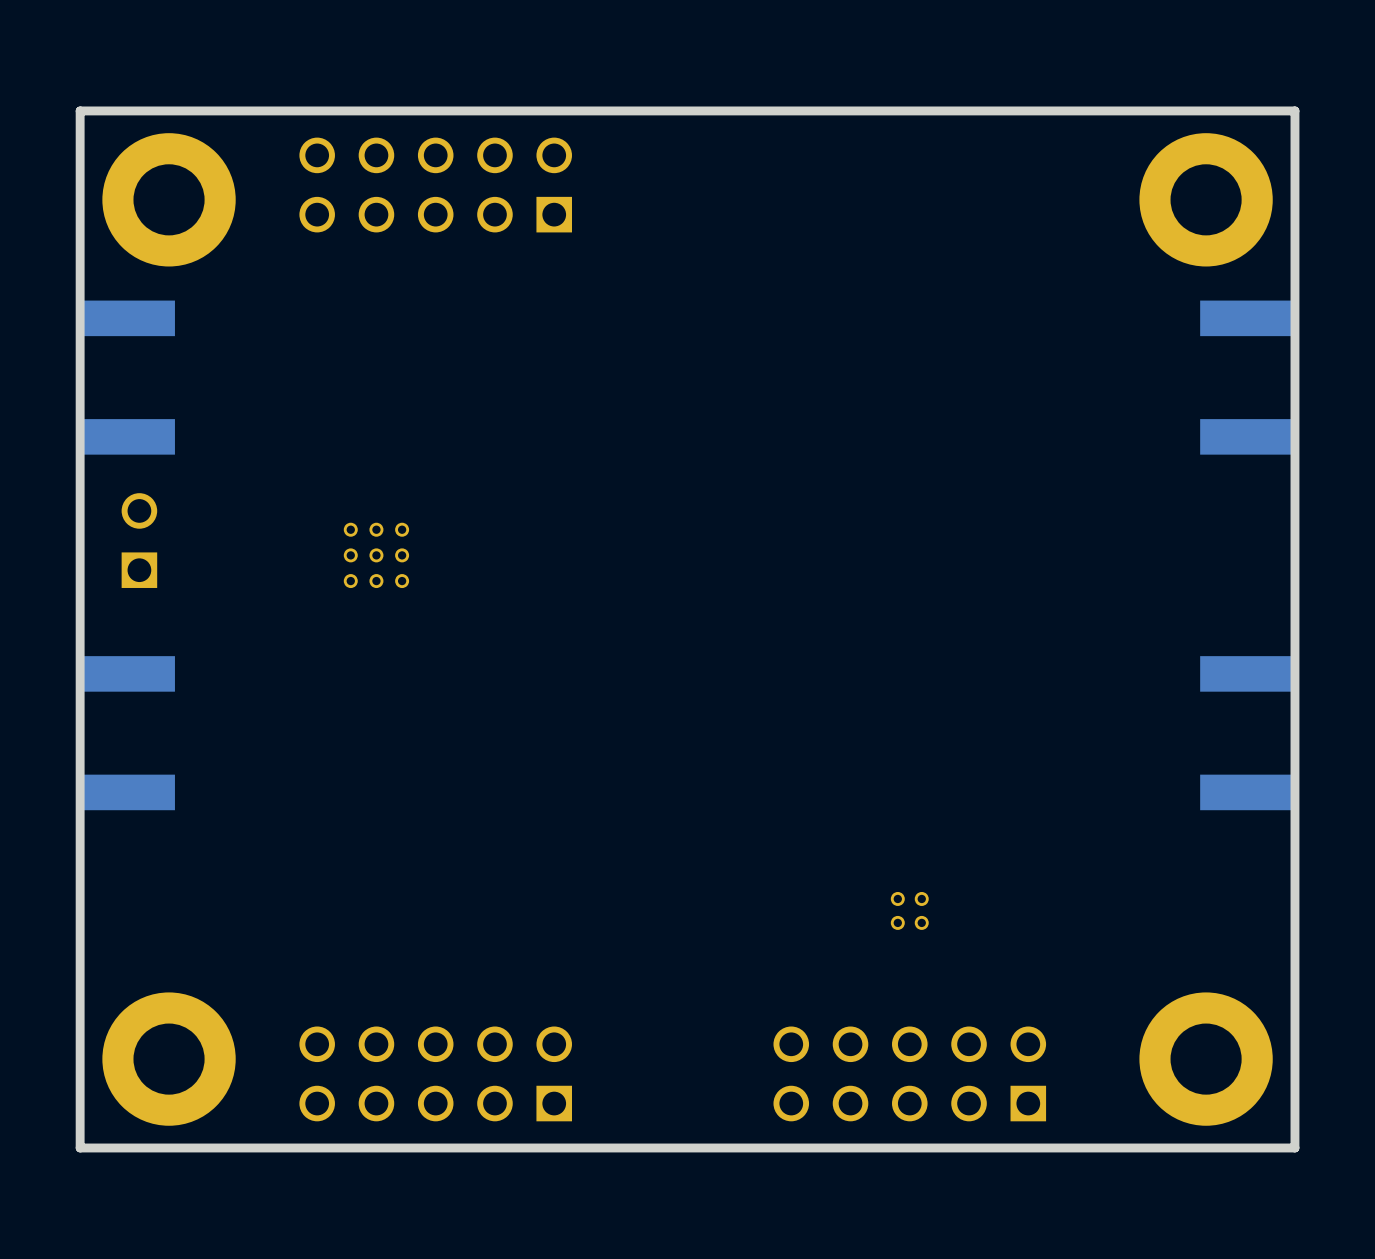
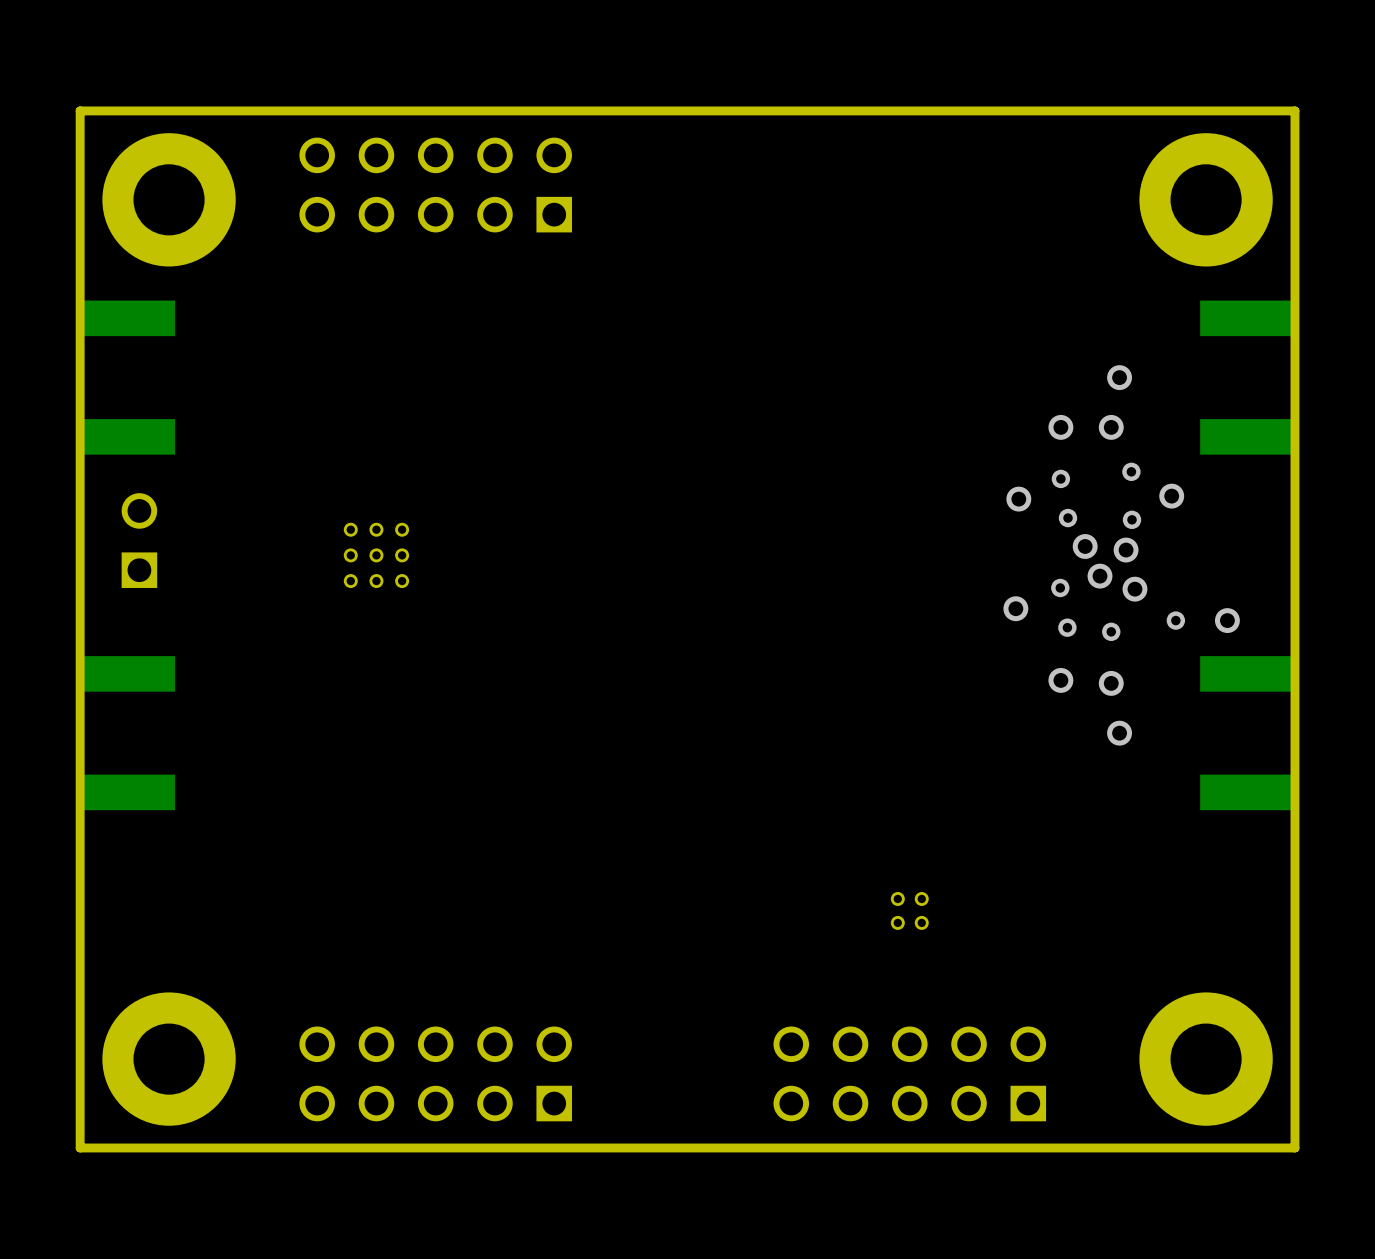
via: none -> (1119, 377)
via: none -> (1060, 427)
via: none -> (1111, 427)
via: none -> (1131, 471)
via: none -> (1060, 478)
via: none -> (1171, 496)
via: none -> (1018, 499)
via: none -> (1068, 518)
via: none -> (1132, 519)
via: none -> (1085, 546)
via: none -> (1126, 550)
via: none -> (1100, 576)
via: none -> (1060, 587)
via: none -> (1134, 589)
via: none -> (1015, 608)
via: none -> (1175, 620)
via: none -> (1227, 620)
via: none -> (1067, 627)
via: none -> (1111, 631)
via: none -> (1060, 680)
via: none -> (1111, 683)
via: none -> (1119, 733)

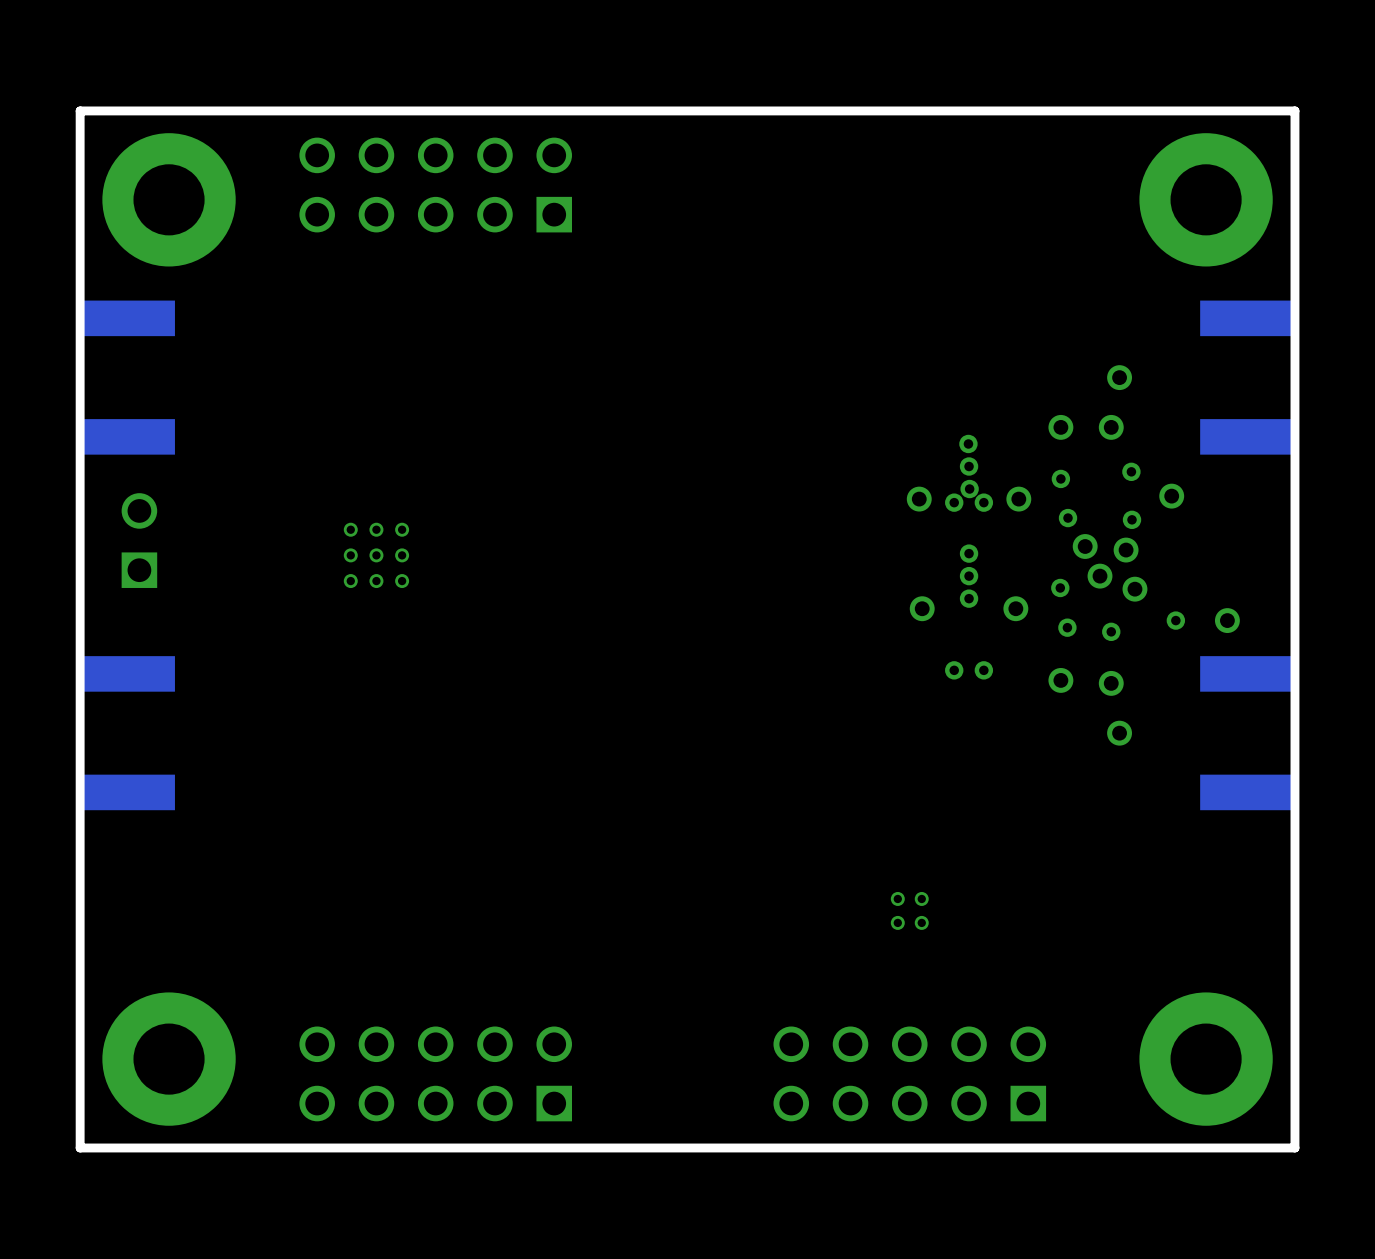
via: none -> (968, 443)
via: none -> (969, 466)
via: none -> (969, 489)
via: none -> (919, 499)
via: none -> (954, 502)
via: none -> (983, 502)
via: none -> (969, 553)
via: none -> (969, 576)
via: none -> (969, 598)
via: none -> (922, 608)
via: none -> (954, 670)
via: none -> (983, 670)

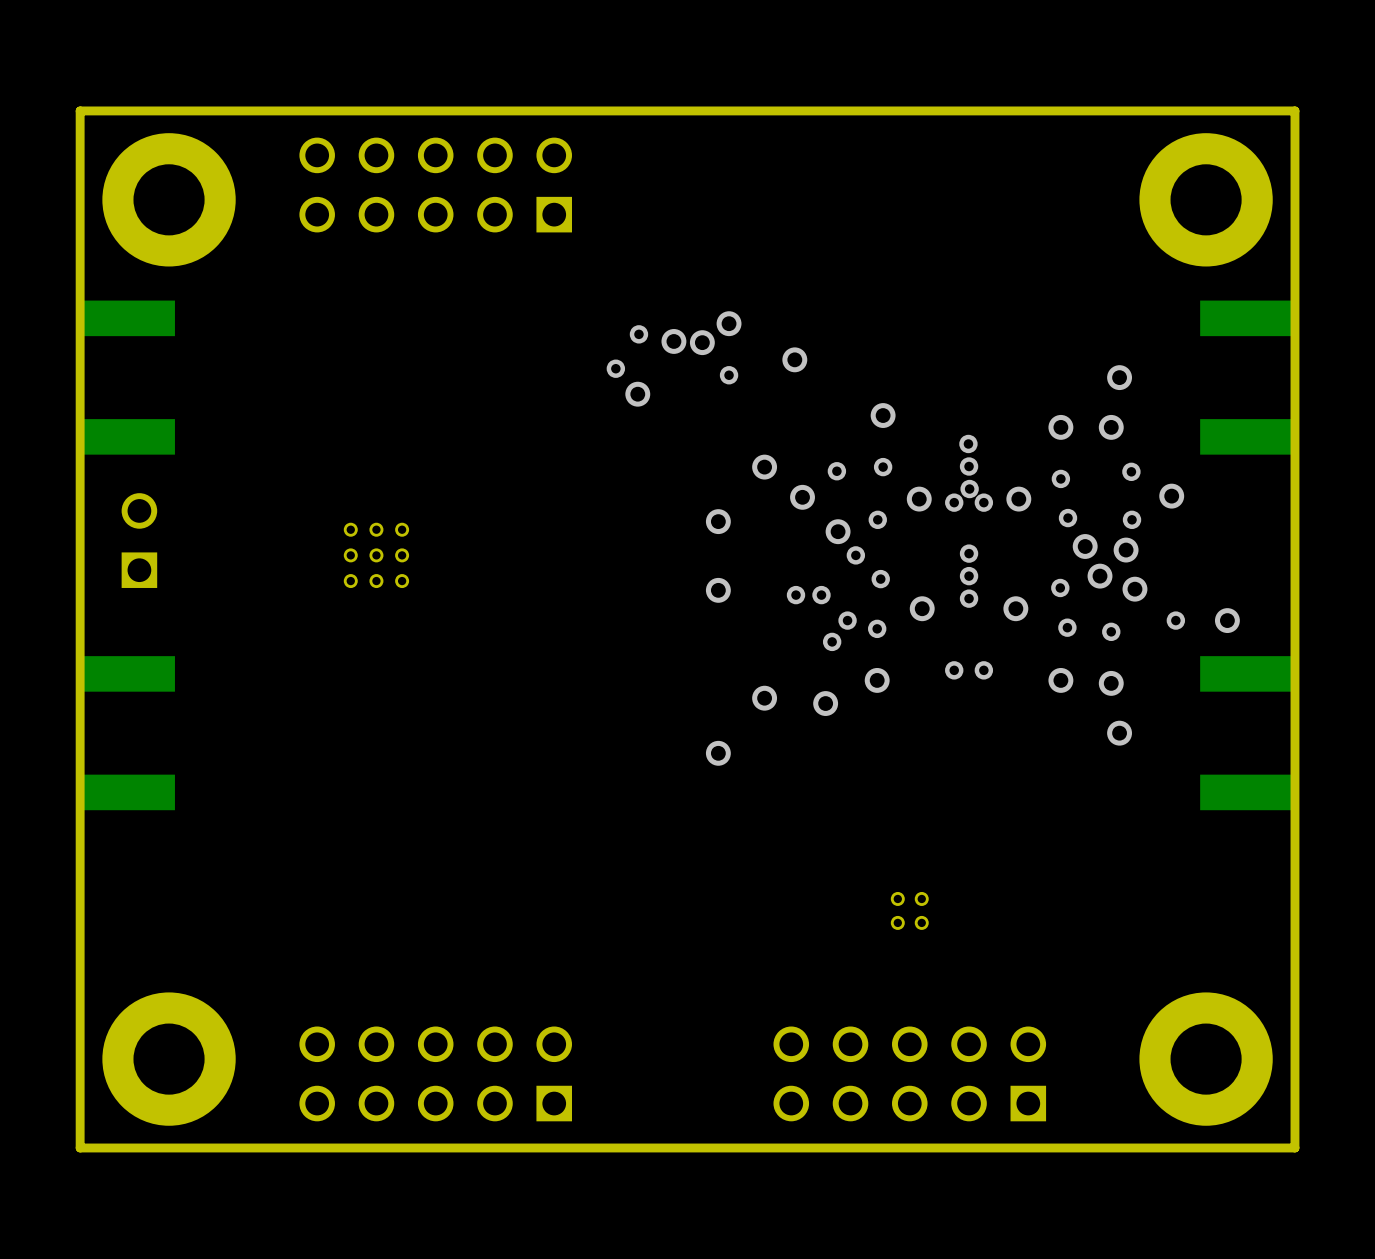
via: none -> (729, 323)
via: none -> (638, 334)
via: none -> (673, 341)
via: none -> (702, 342)
via: none -> (794, 359)
via: none -> (615, 368)
via: none -> (729, 375)
via: none -> (637, 394)
via: none -> (883, 415)
via: none -> (764, 467)
via: none -> (883, 467)
via: none -> (836, 471)
via: none -> (802, 497)
via: none -> (877, 519)
via: none -> (718, 521)
via: none -> (838, 531)
via: none -> (855, 555)
via: none -> (880, 579)
via: none -> (718, 590)
via: none -> (796, 595)
via: none -> (821, 595)
via: none -> (847, 620)
via: none -> (877, 628)
via: none -> (832, 641)
via: none -> (877, 680)
via: none -> (764, 698)
via: none -> (825, 703)
via: none -> (718, 753)

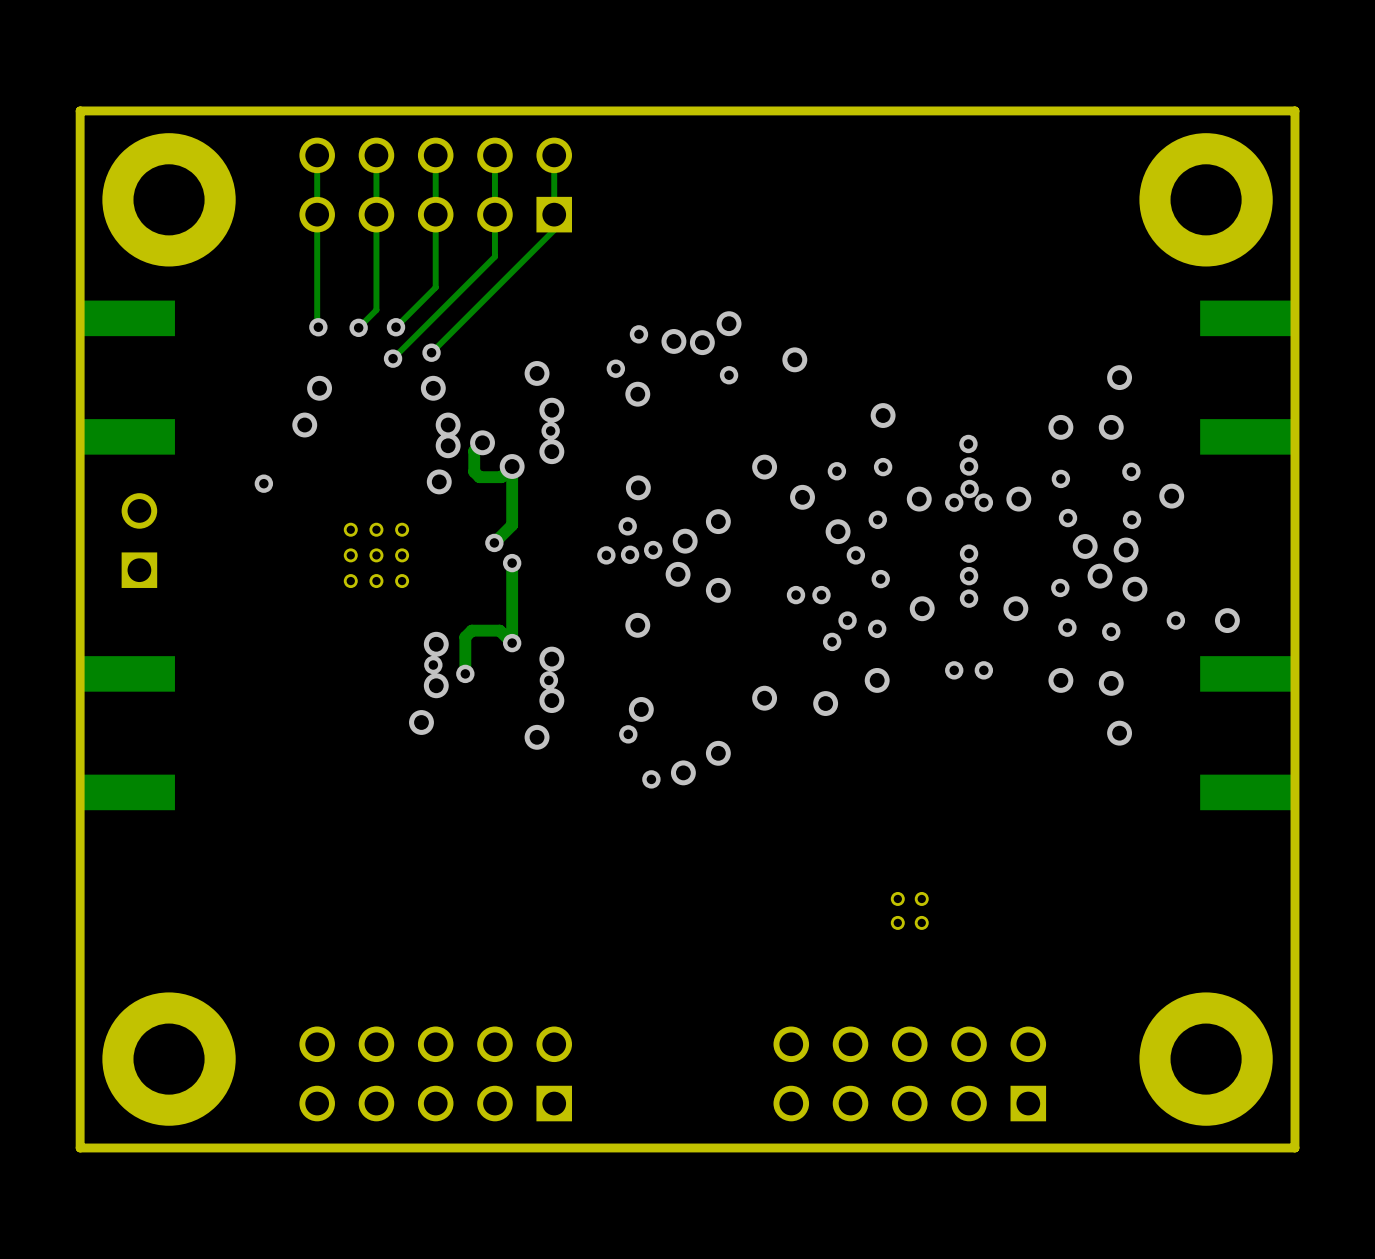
track: none -> (317, 155) (318, 327)
track: none -> (376, 155) (376, 310) (358, 327)
track: none -> (435, 155) (435, 287) (396, 327)
track: none -> (494, 155) (494, 256) (393, 358)
track: none -> (554, 155) (554, 230) (431, 352)
via: none -> (318, 327)
via: none -> (358, 327)
via: none -> (396, 327)
via: none -> (431, 352)
via: none -> (393, 358)
via: none -> (537, 373)
via: none -> (319, 388)
via: none -> (433, 388)
via: none -> (551, 410)
via: none -> (304, 425)
via: none -> (448, 425)
via: none -> (550, 430)
track: none -> (482, 442) (474, 451) (474, 471) (479, 477) (501, 477) (512, 466) (512, 525) (494, 542)
via: none -> (482, 442)
via: none -> (448, 445)
via: none -> (551, 451)
via: none -> (512, 466)
via: none -> (439, 481)
via: none -> (263, 483)
via: none -> (638, 487)
via: none -> (627, 526)
via: none -> (685, 541)
via: none -> (494, 542)
via: none -> (653, 550)
via: none -> (630, 554)
via: none -> (606, 555)
track: none -> (512, 563) (512, 643) (499, 630) (471, 630) (465, 637) (465, 673)
via: none -> (512, 563)
via: none -> (678, 574)
via: none -> (637, 625)
via: none -> (512, 643)
via: none -> (436, 644)
via: none -> (551, 659)
via: none -> (433, 665)
via: none -> (465, 673)
via: none -> (548, 680)
via: none -> (436, 685)
via: none -> (551, 700)
via: none -> (641, 709)
via: none -> (421, 722)
via: none -> (628, 734)
via: none -> (537, 737)
via: none -> (683, 772)
via: none -> (651, 779)

